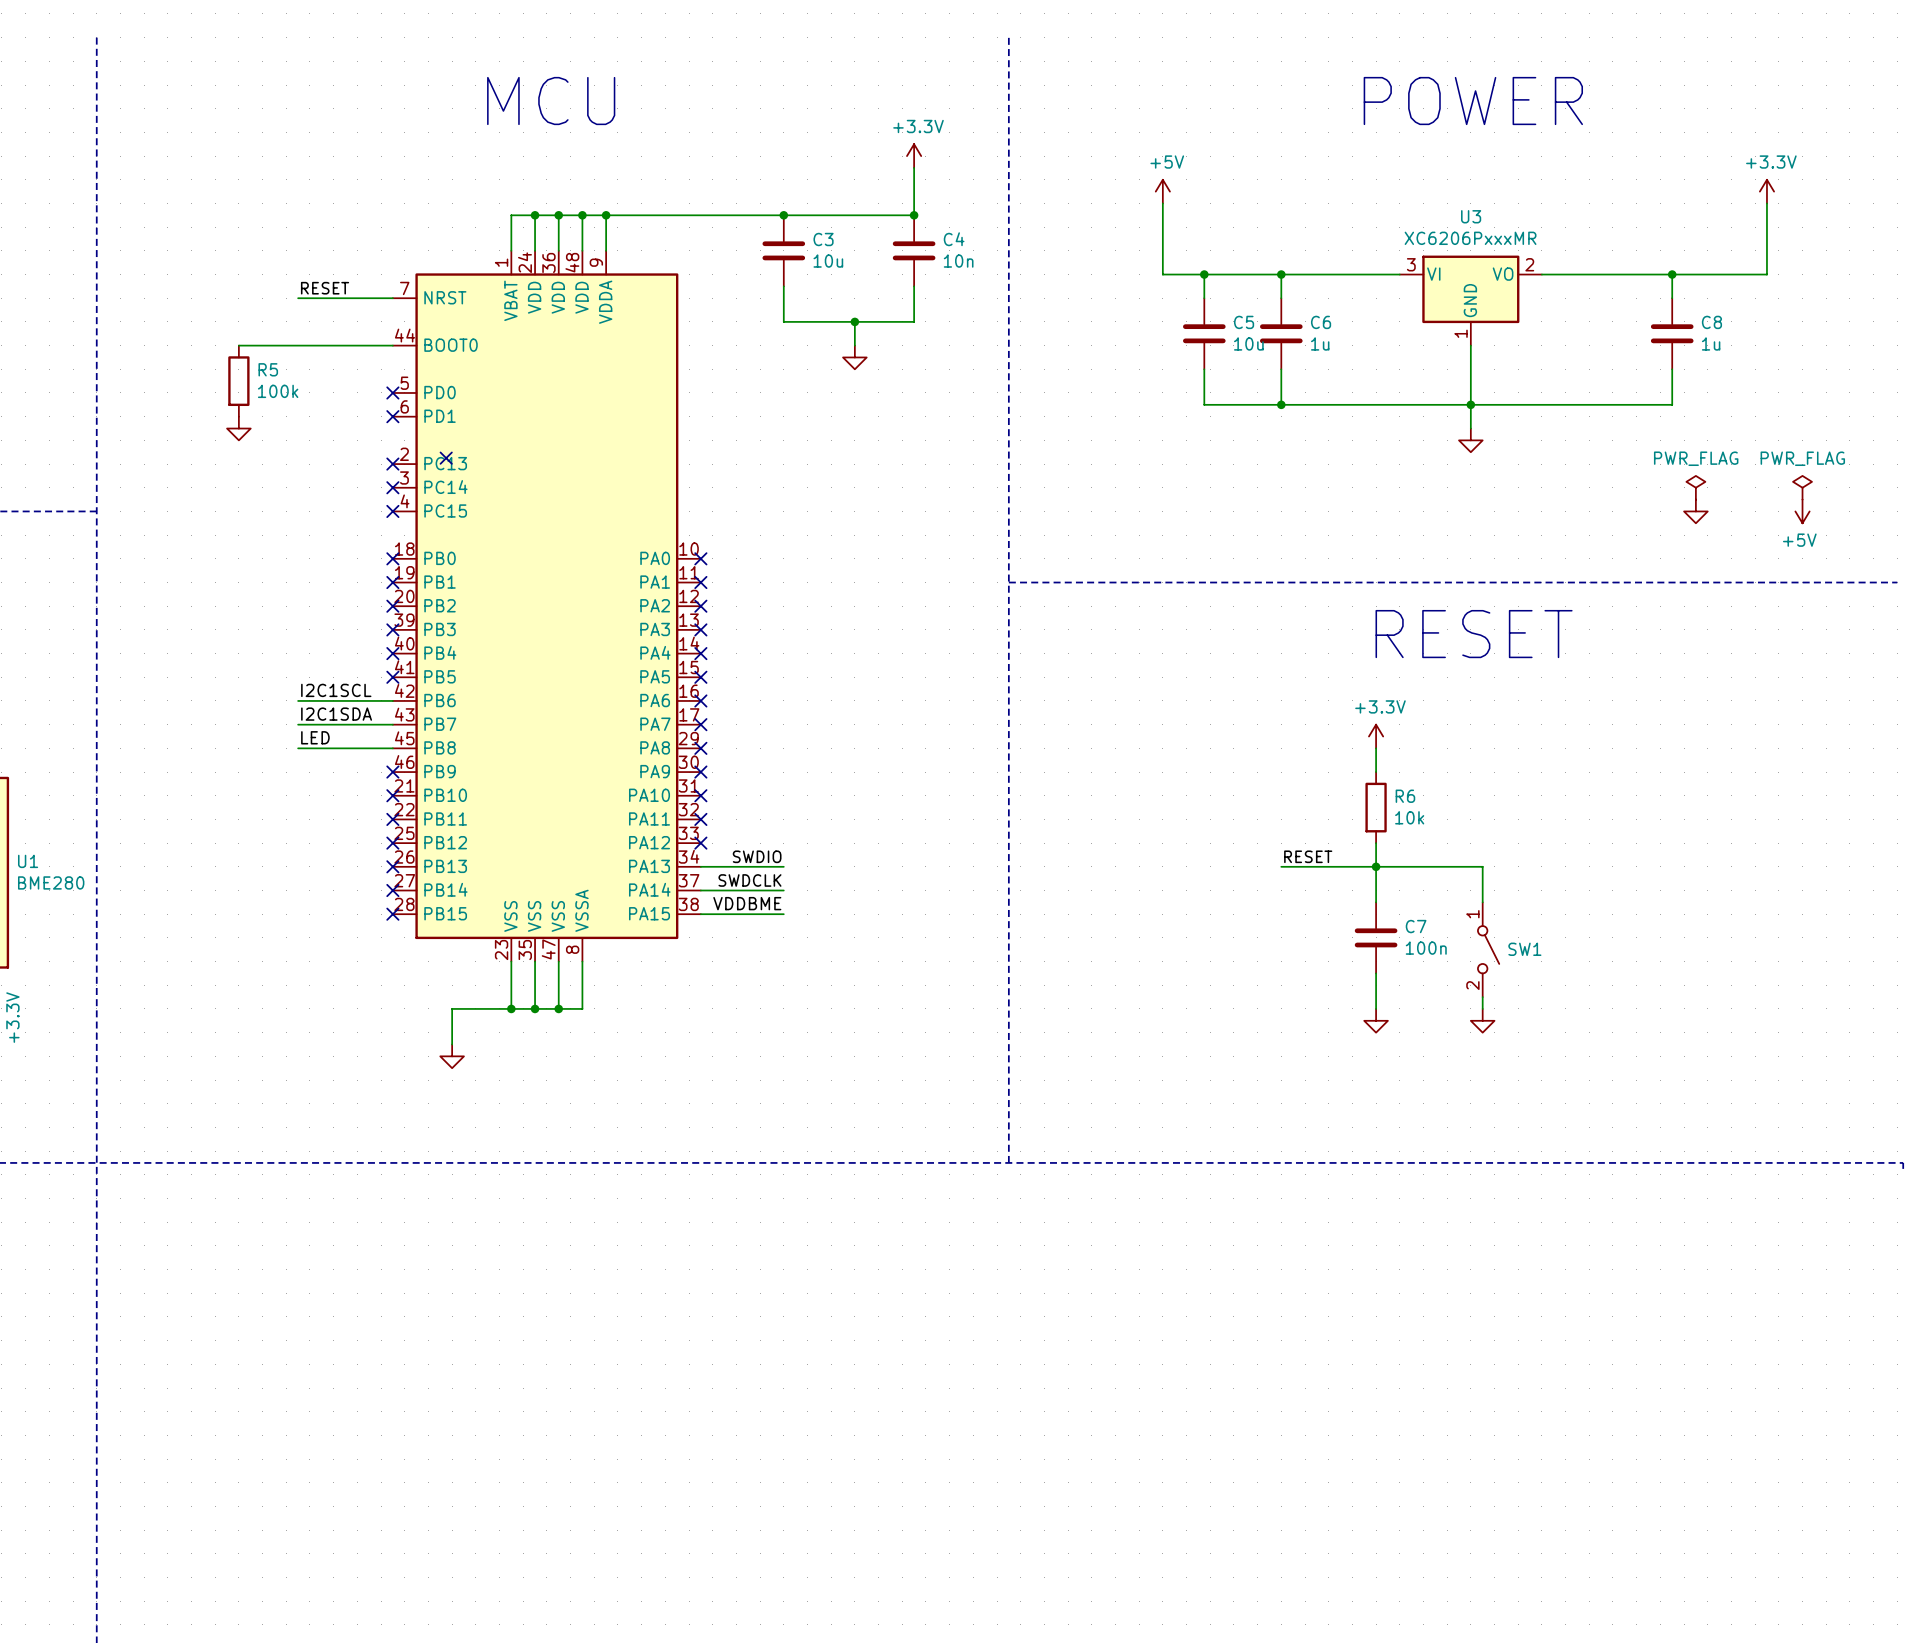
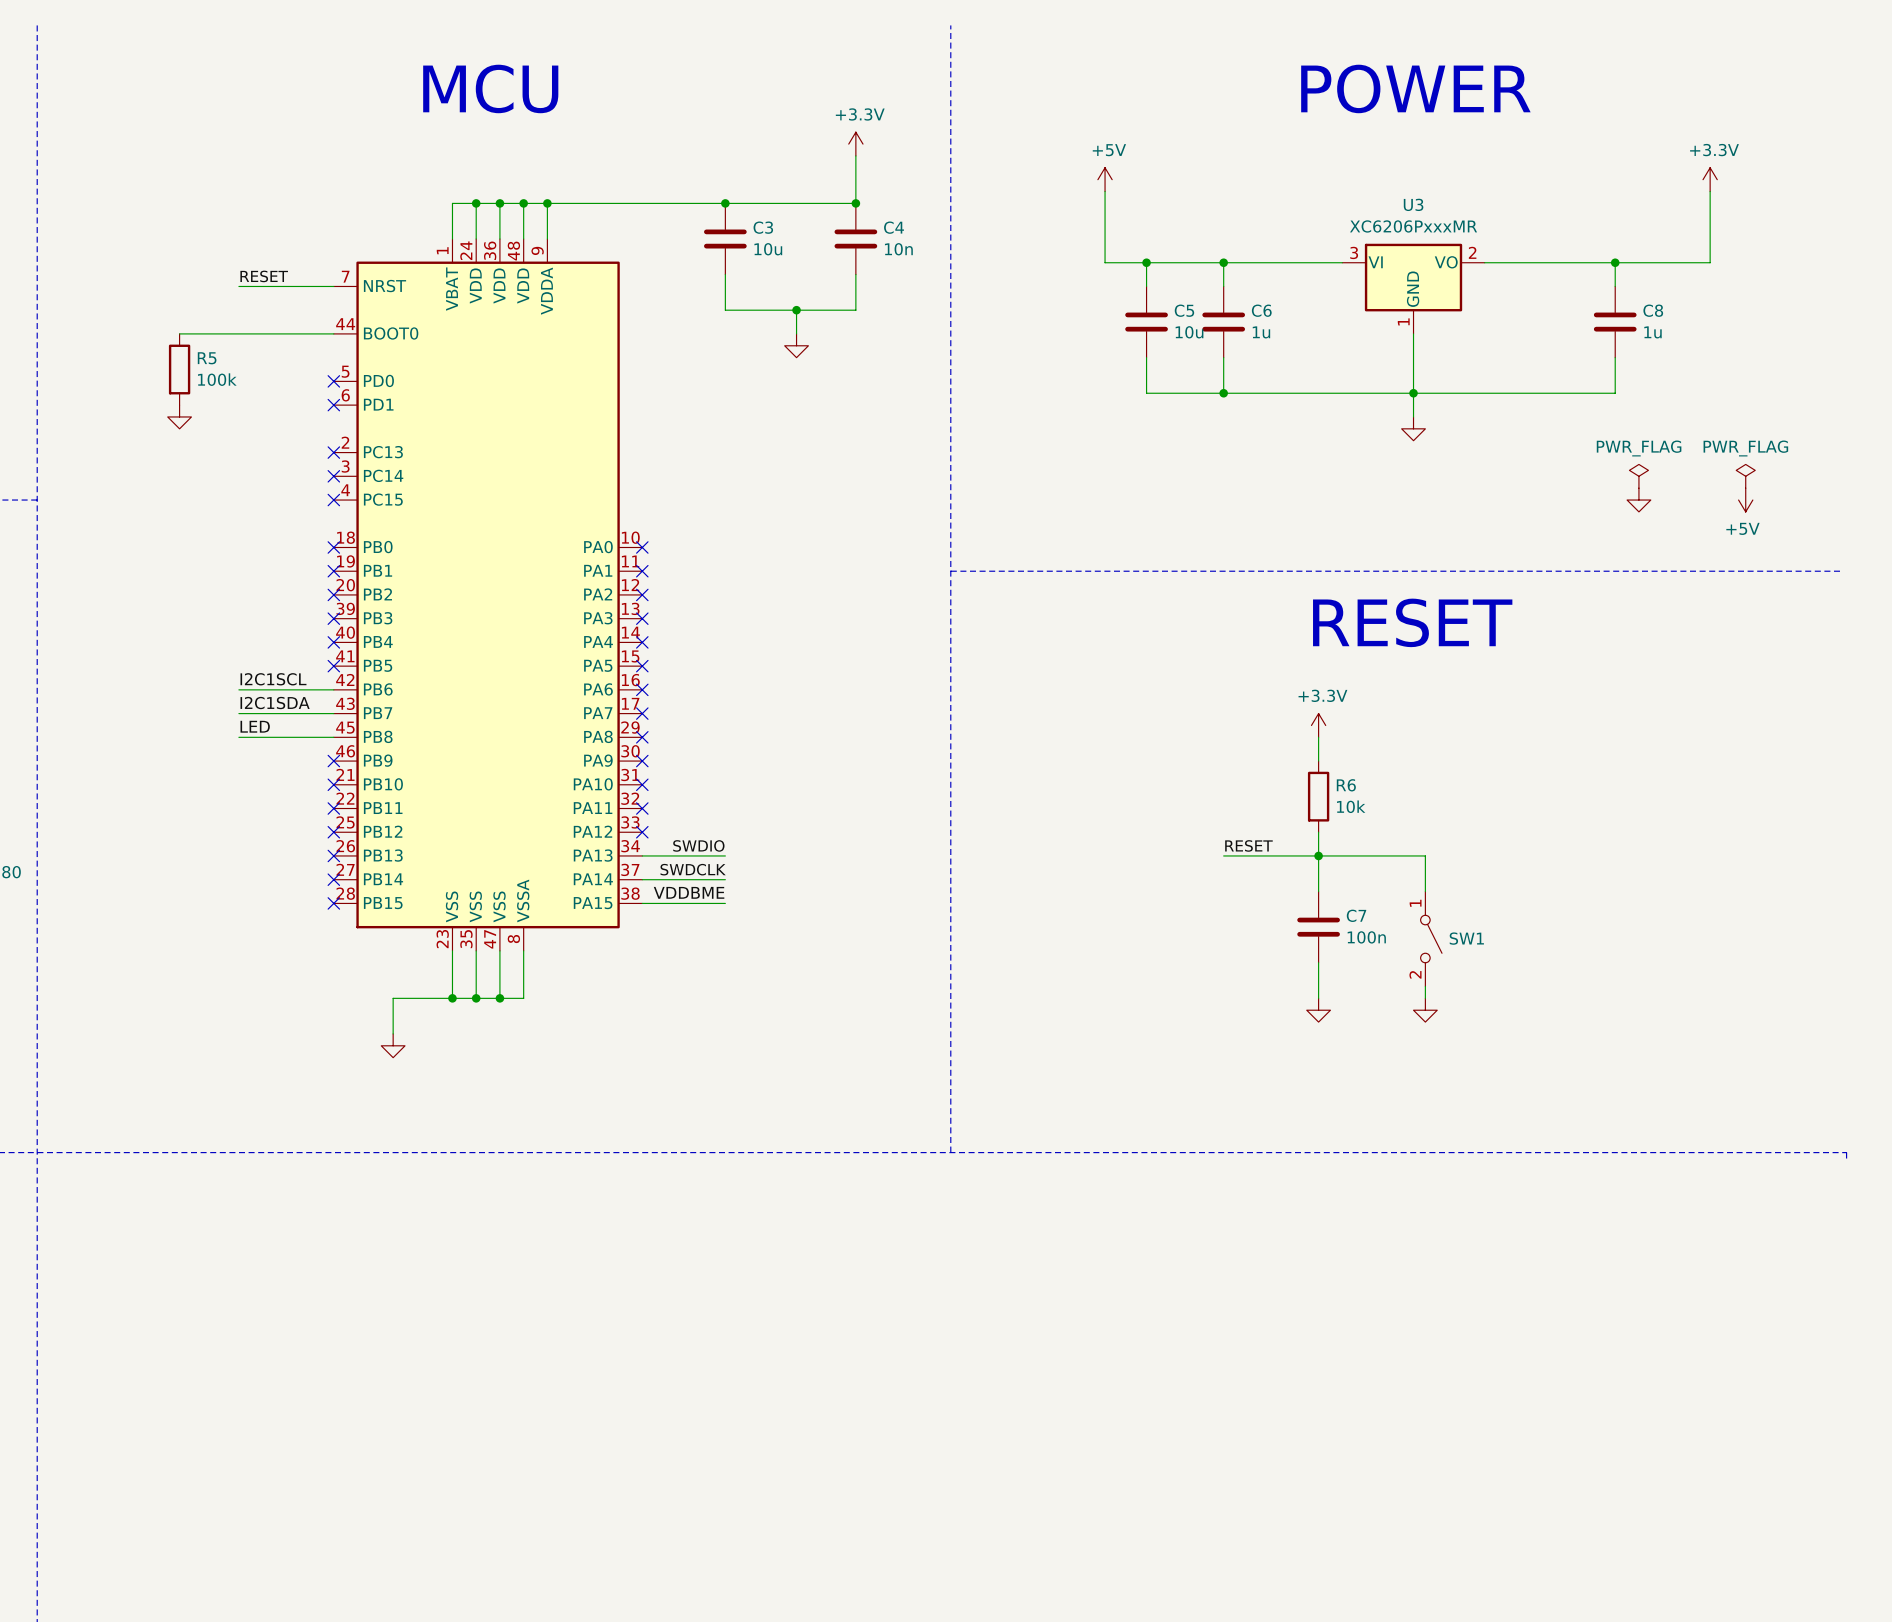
no-connect mark: (446, 458) -> none

